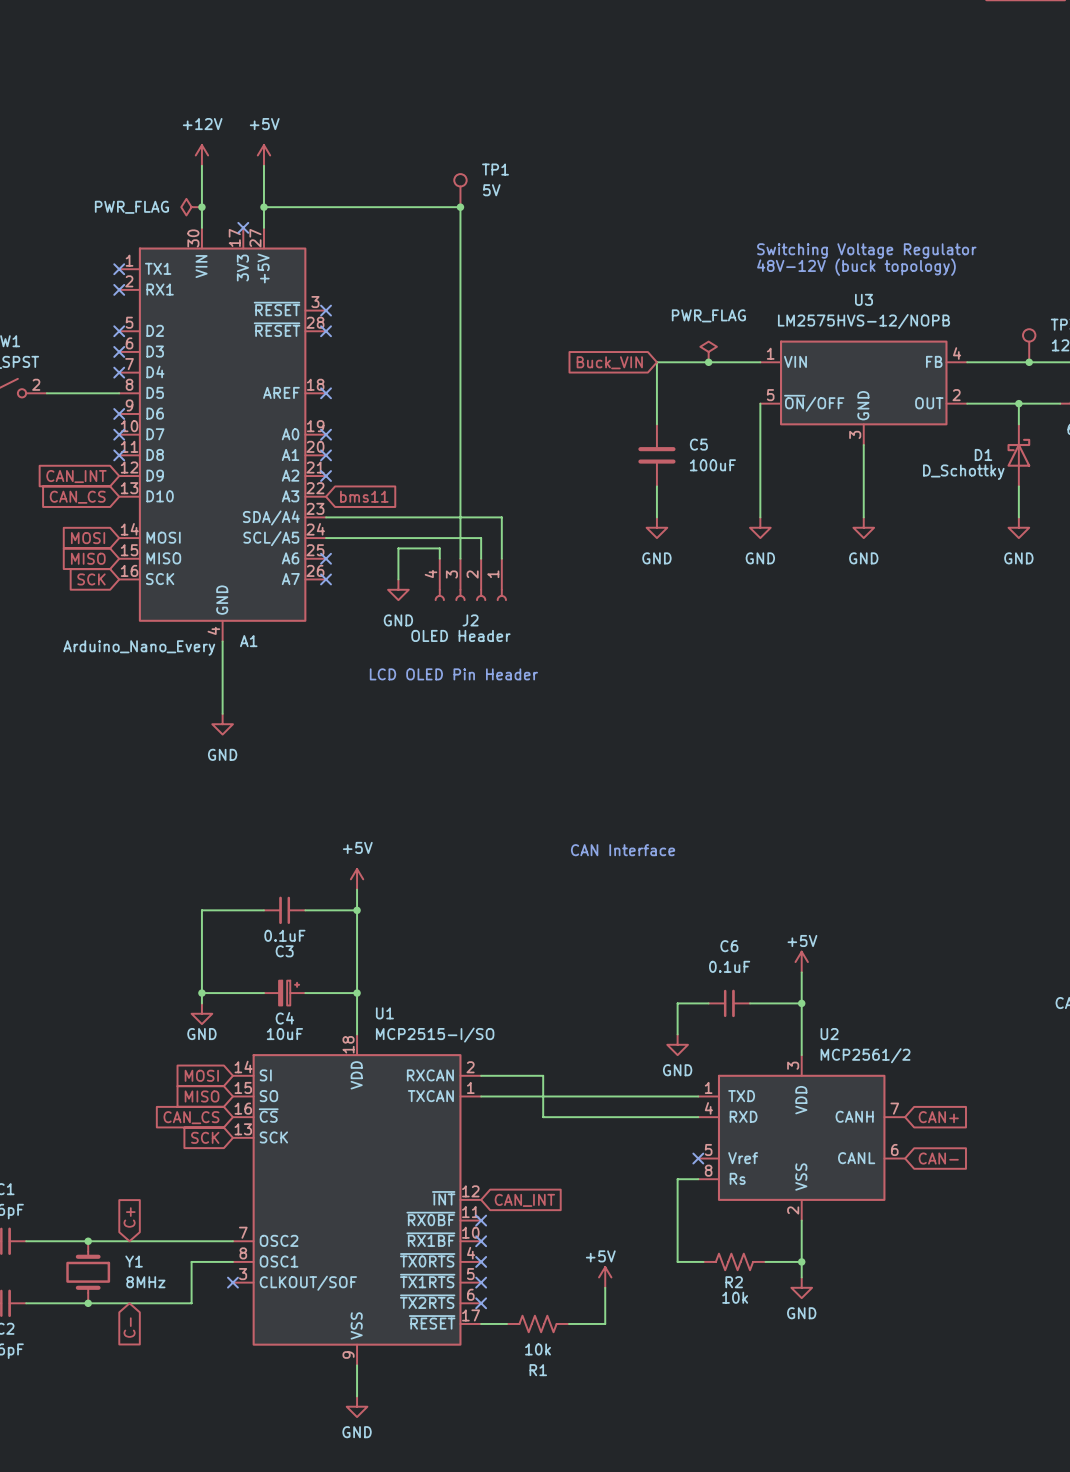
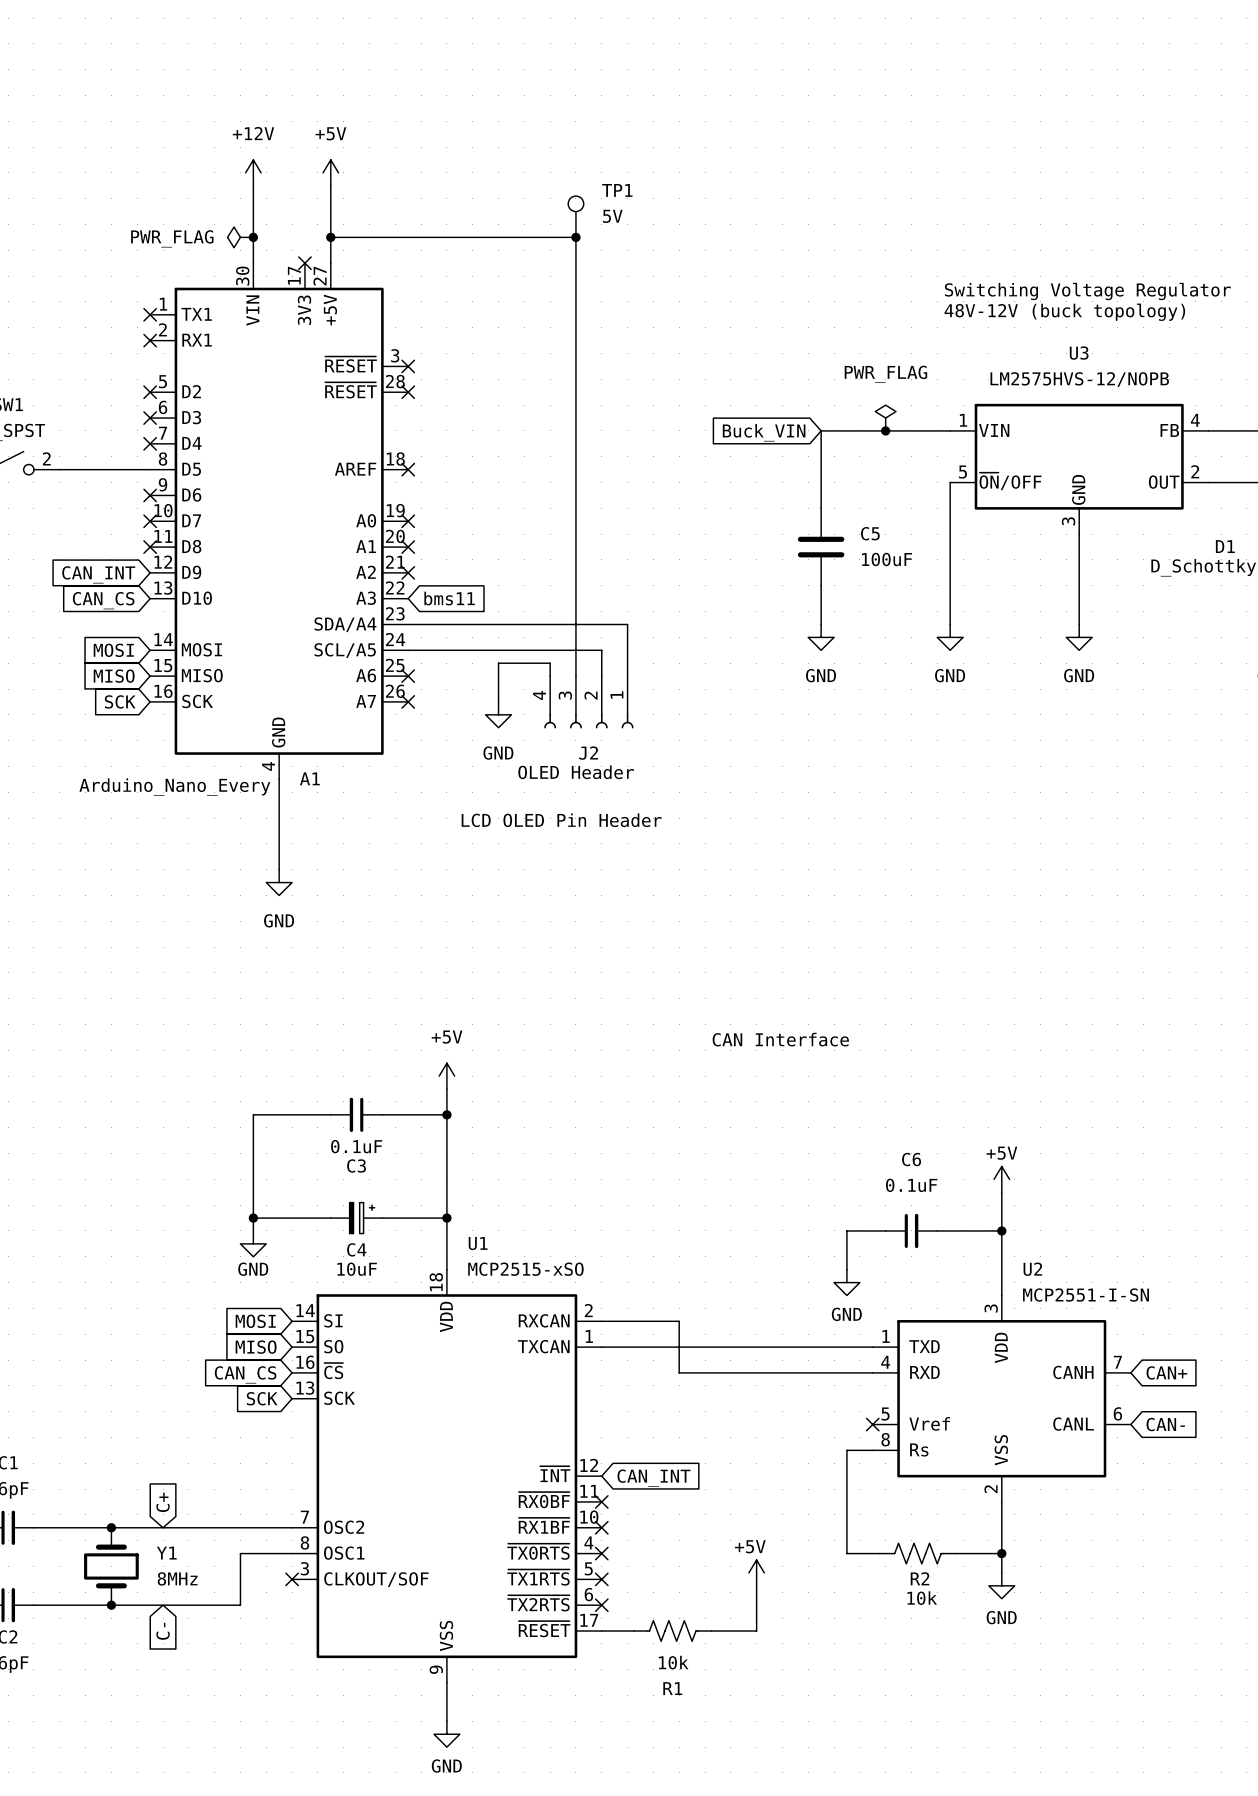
U1 value: MCP2515-I/SO (435, 1035) -> MCP2515-xSO (525, 1269)
U2 value: MCP2561/2 (865, 1055) -> MCP2551-I-SN (1086, 1295)

